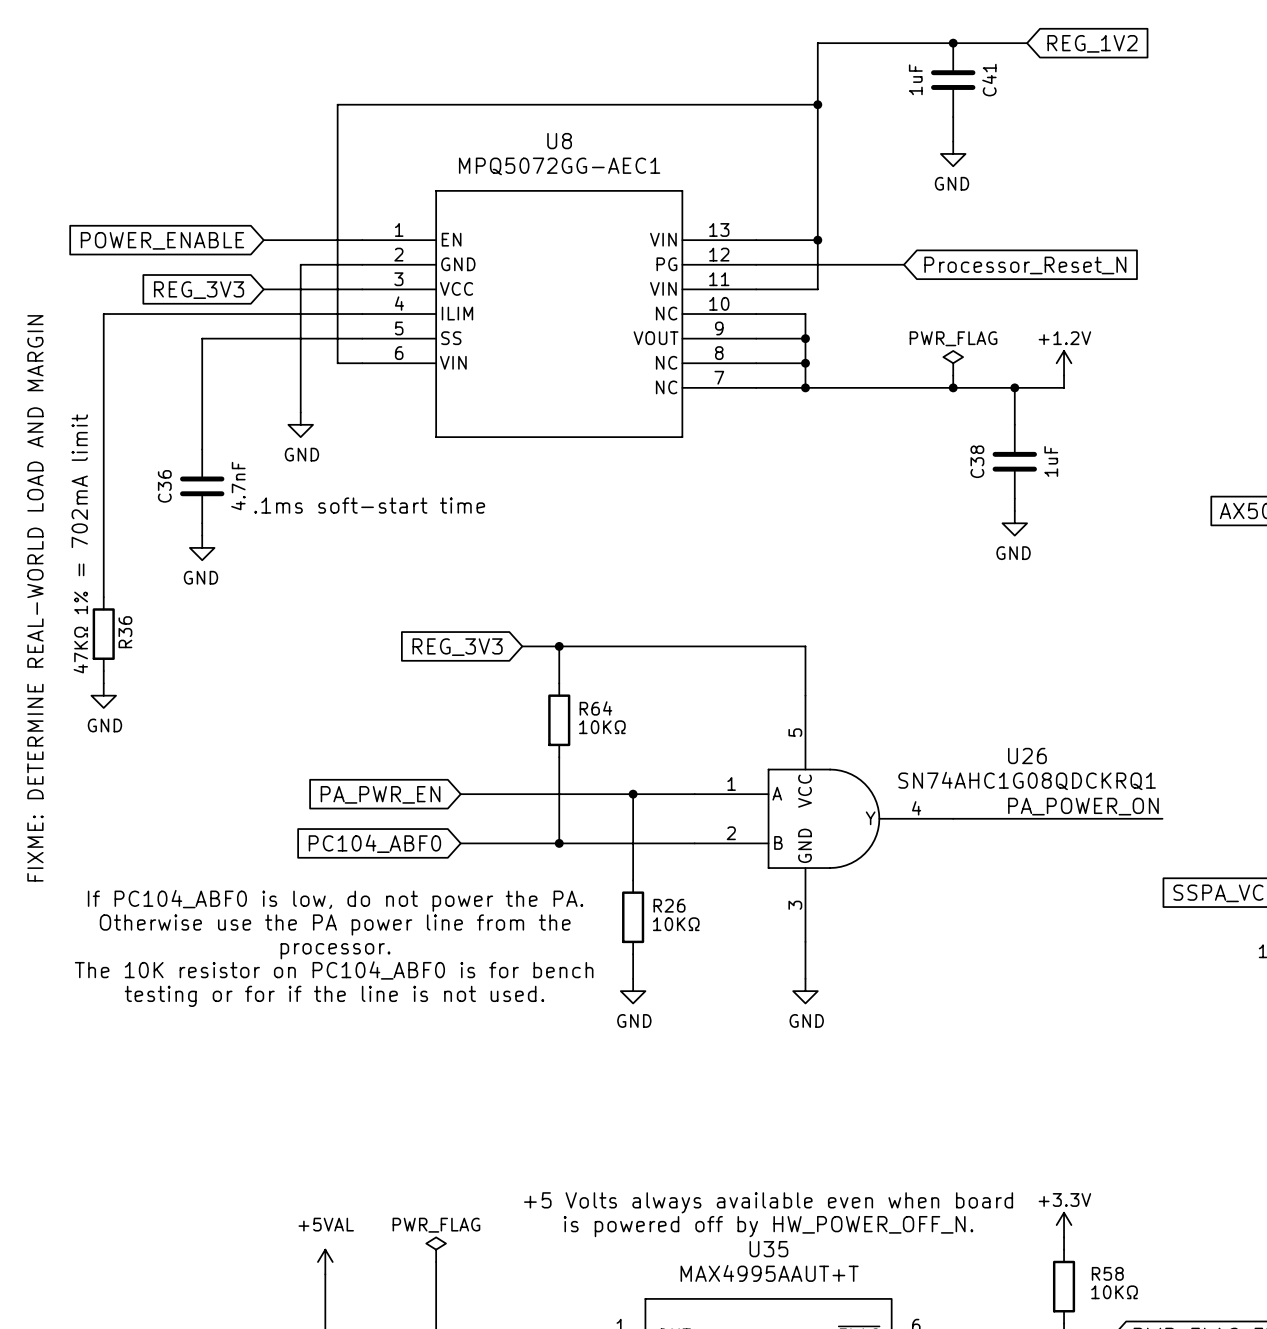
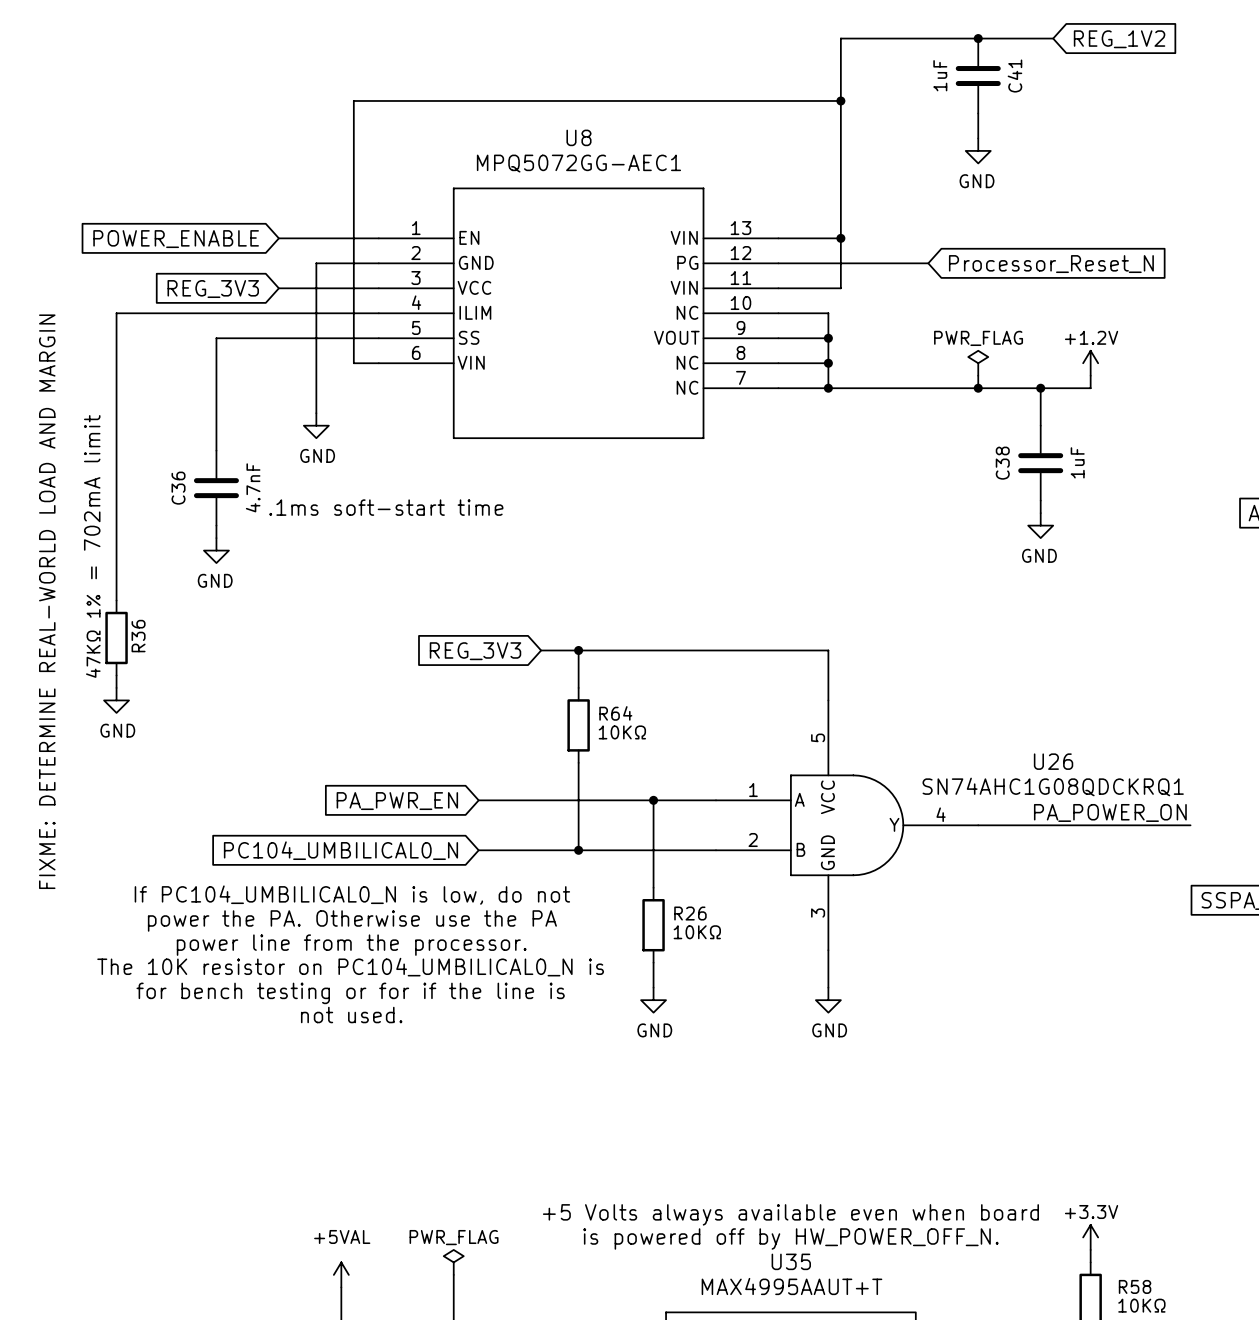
global label: PC104_ABF0 (374, 843) -> PC104_UMBILICAL0_N (340, 850)
text: If PC104_ABF0 is low, do not power the PA. (335, 900) -> If PC104_UMBILICAL0_N is low, do not (352, 895)
text: none -> power the PA. Otherwise use the PA (352, 920)
text: Otherwise use the PA power line from the (335, 924) -> none
text: none -> power line from the processor. (351, 945)
text: processor. (335, 951) -> none
text: The 10K resistor on PC104_ABF0 is for bench (334, 970) -> The 10K resistor on PC104_UMBILICAL0_N is (350, 967)
text: testing or for if the line is not used. (334, 996) -> for bench testing or for if the line is (350, 993)
text: none -> not used. (351, 1015)

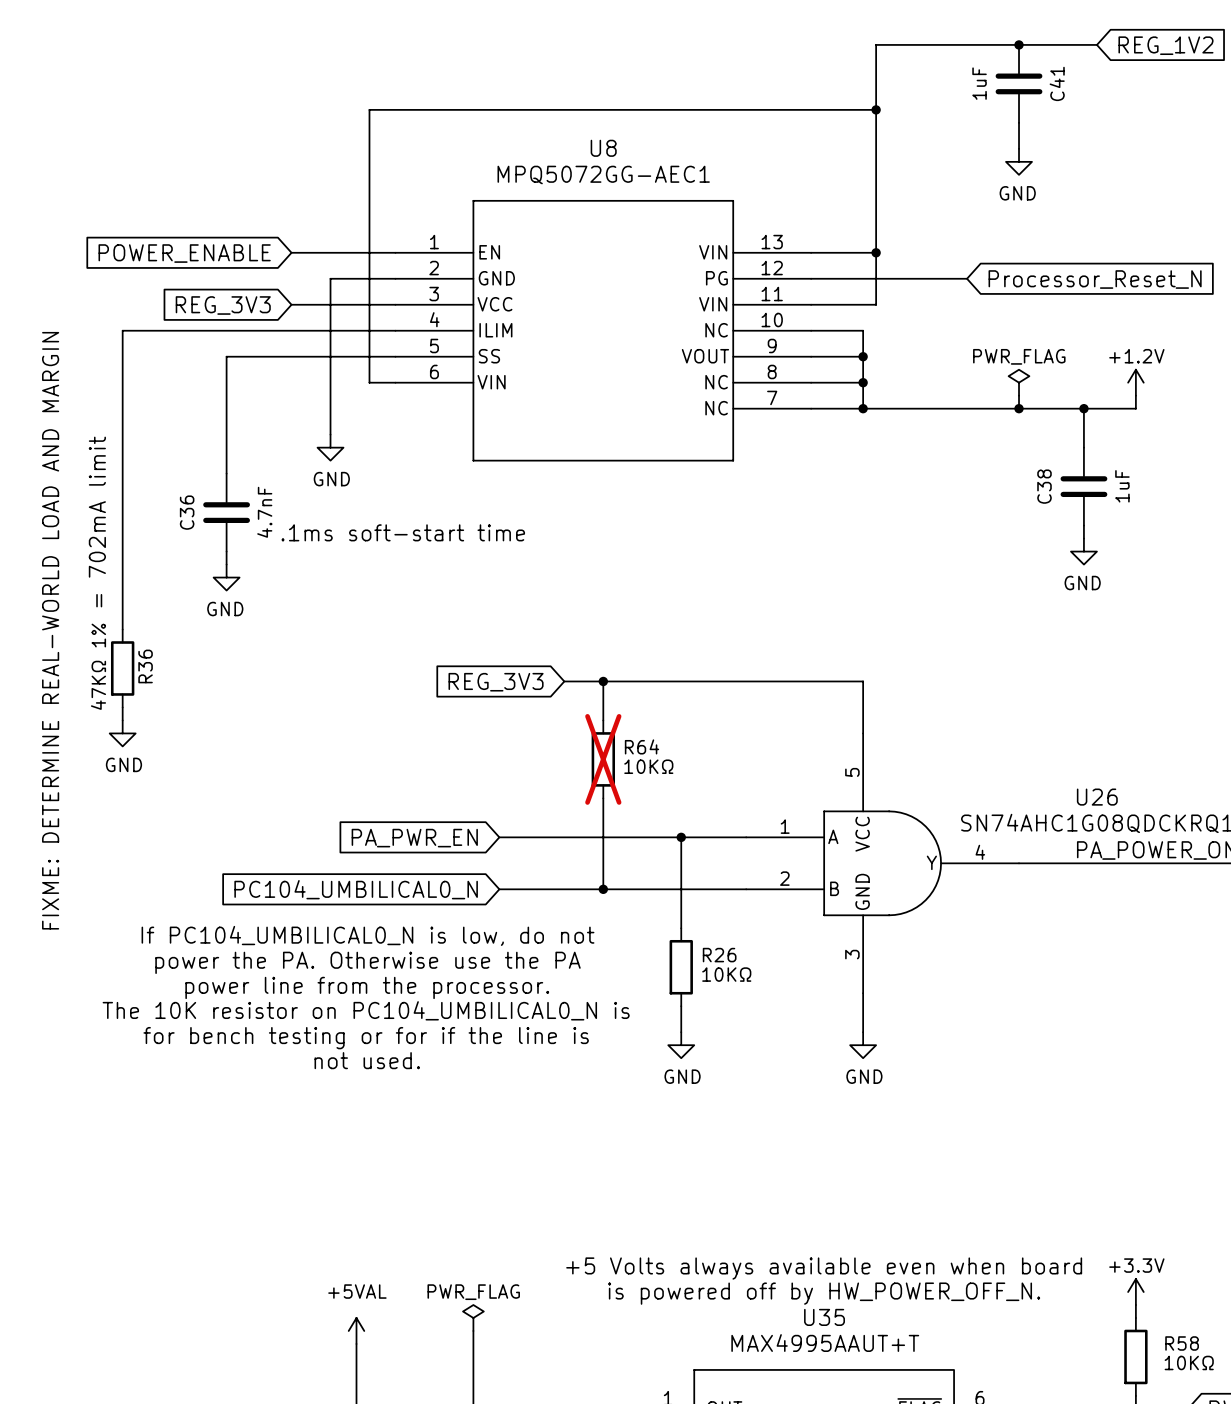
R64 do-not-place cross: none -> (603, 759)

